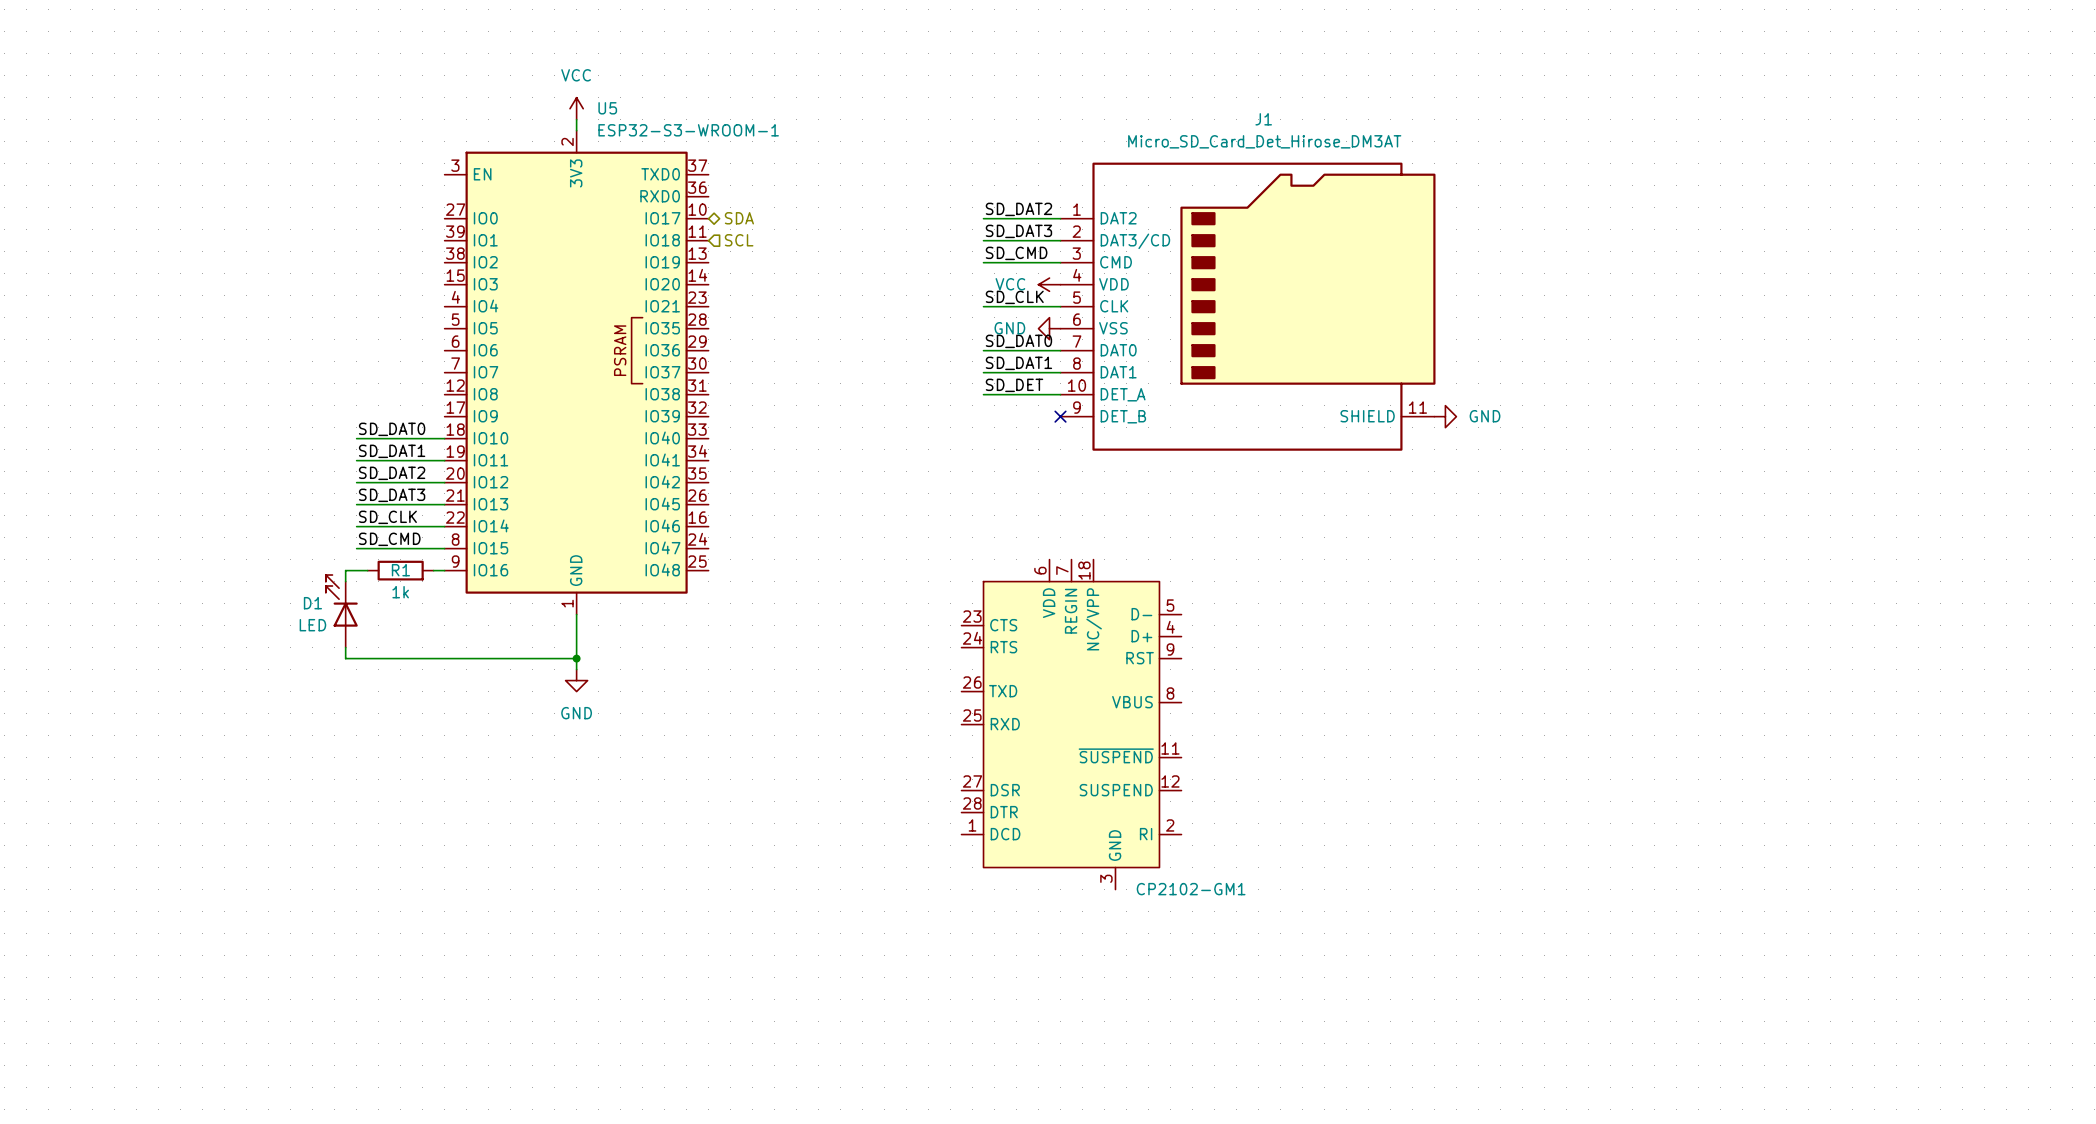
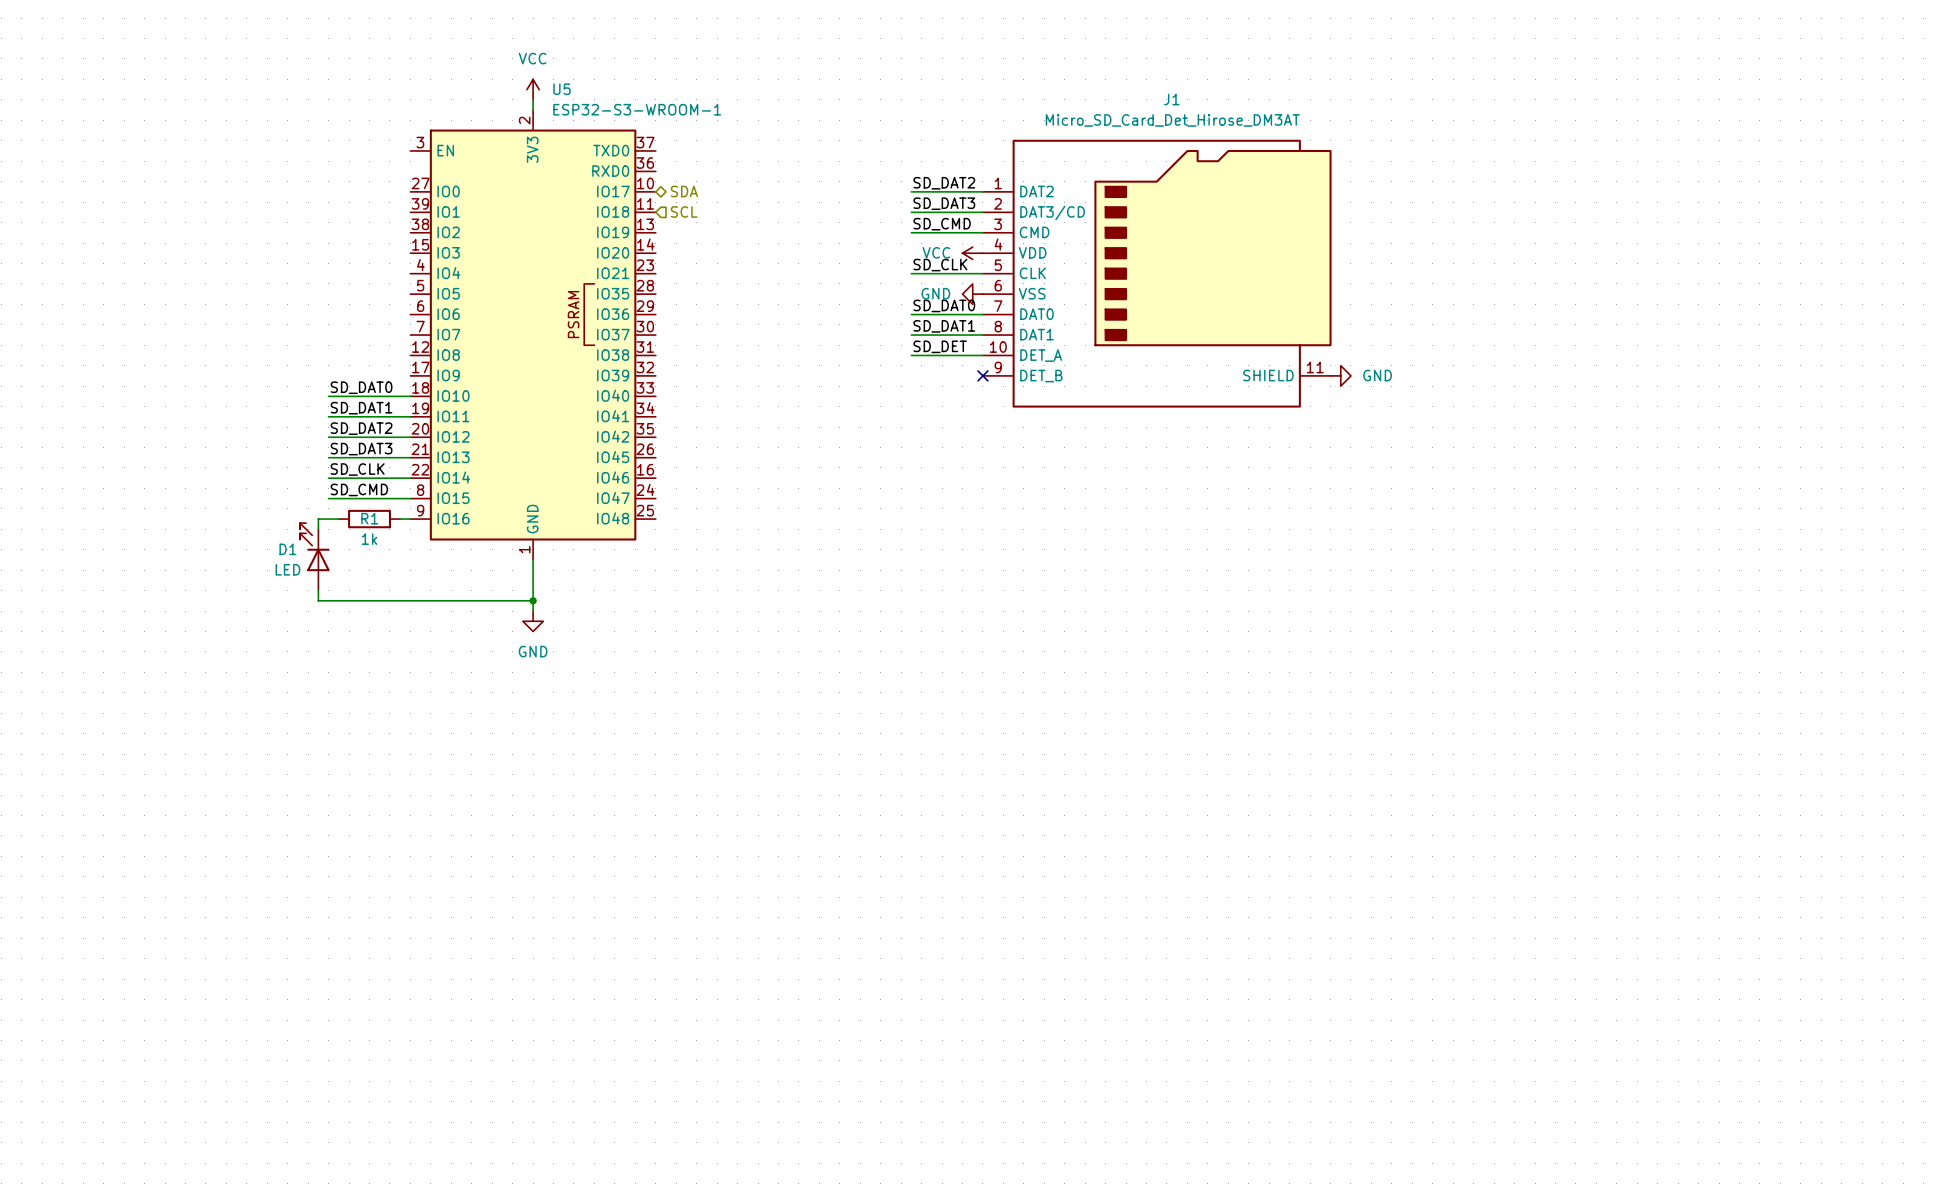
CP2102-GM1: (1071, 724) -> none

